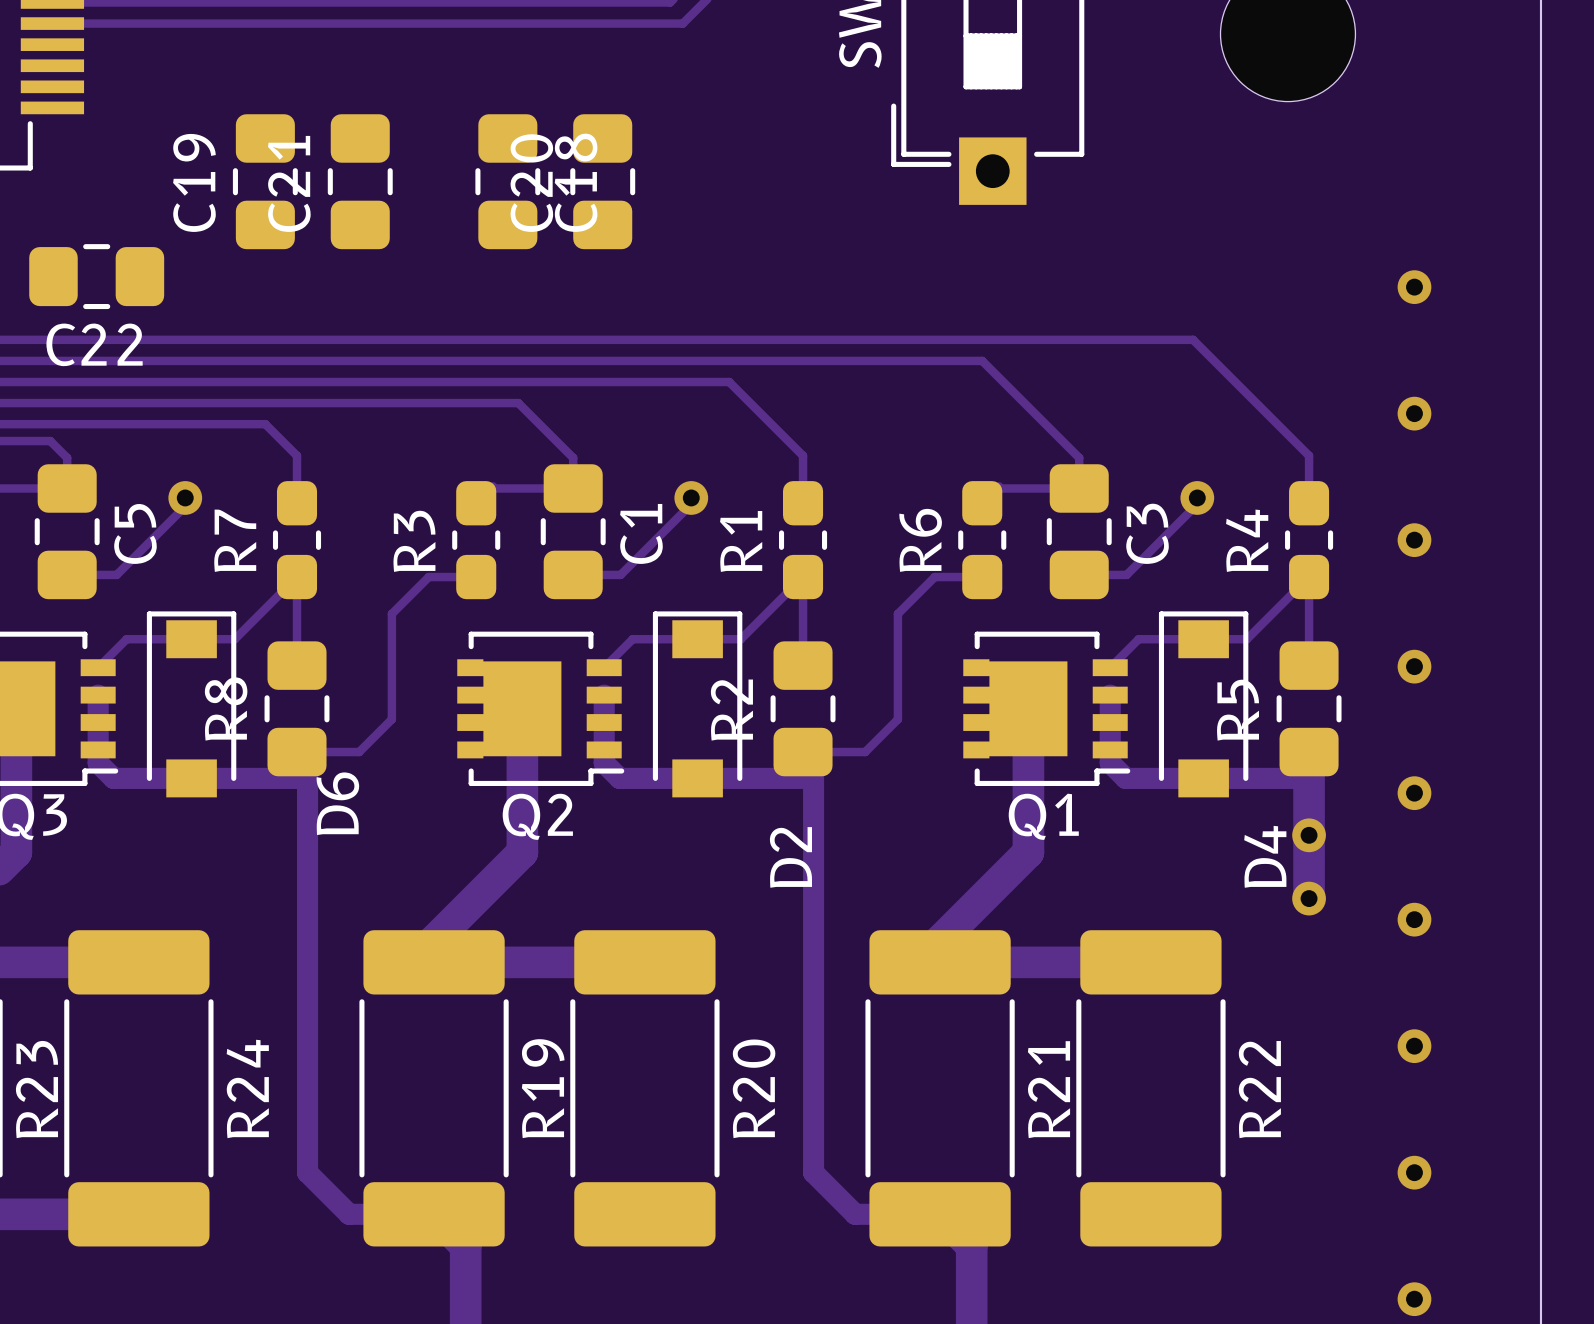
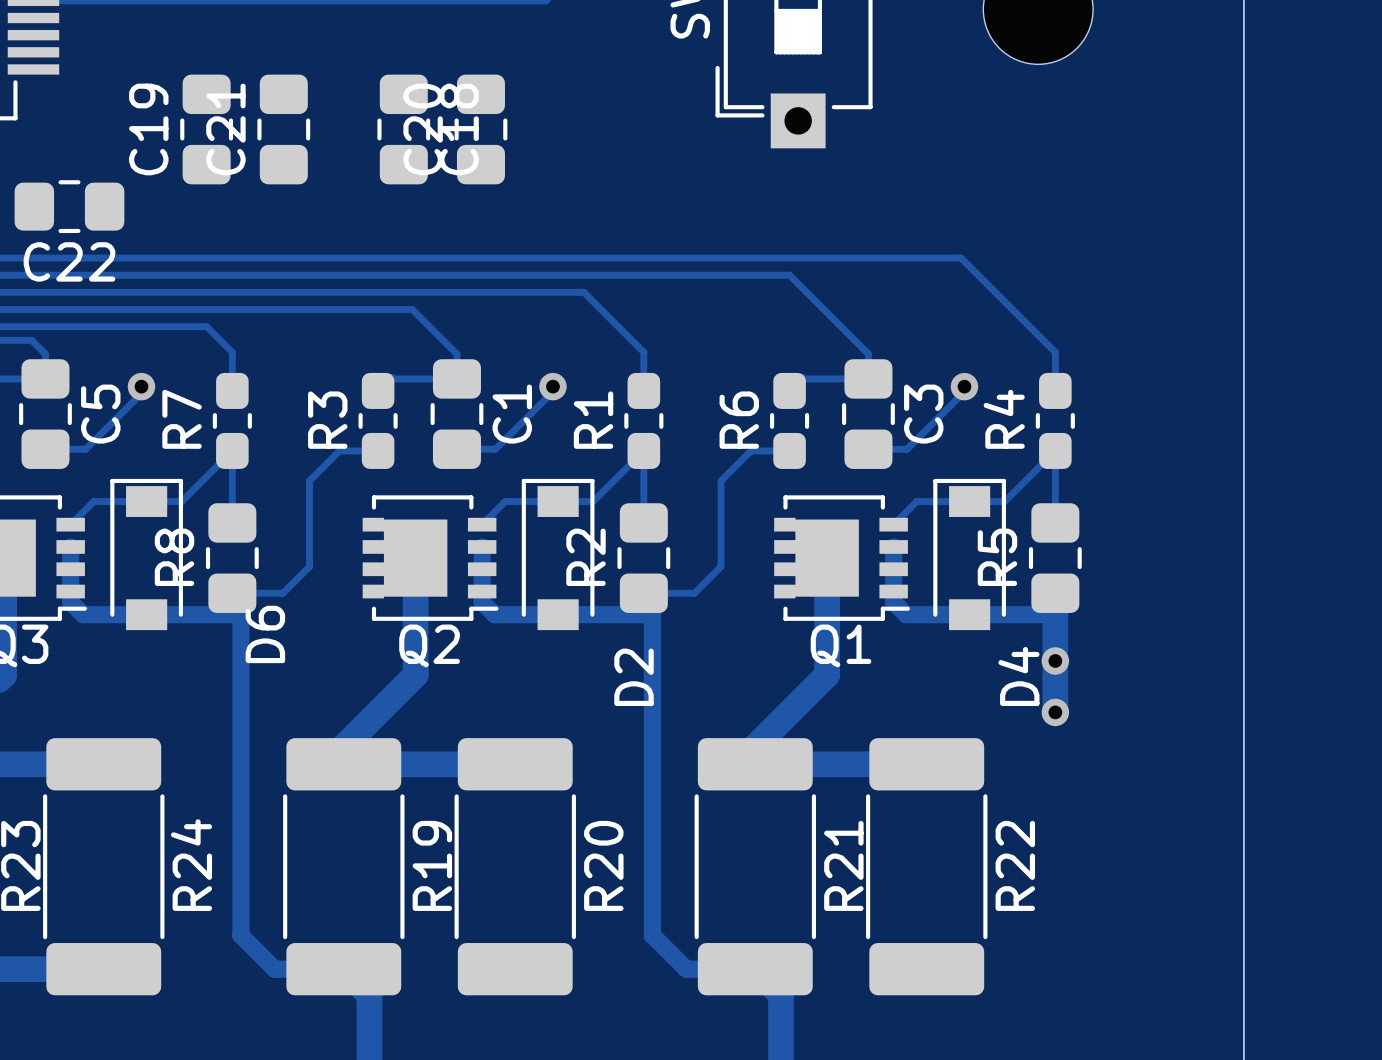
via: (1414, 287) -> none
via: (1414, 413) -> none
via: (1414, 540) -> none
via: (1414, 666) -> none
via: (1414, 793) -> none
via: (1414, 919) -> none
via: (1414, 1046) -> none
via: (1414, 1172) -> none
via: (1414, 1299) -> none

